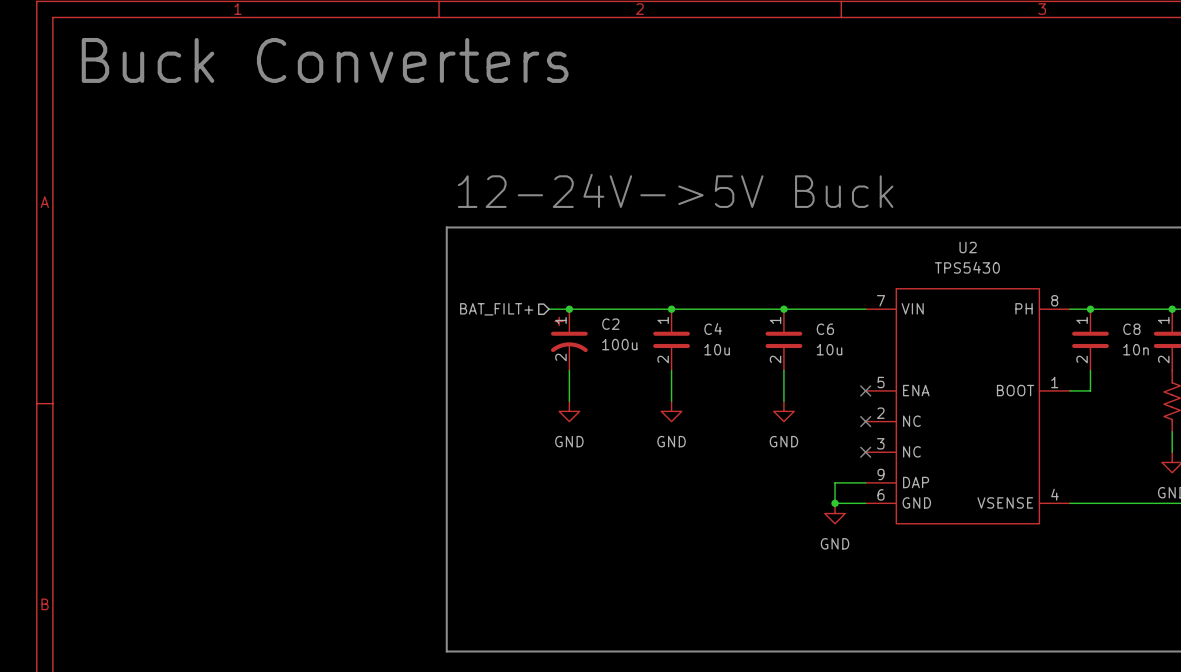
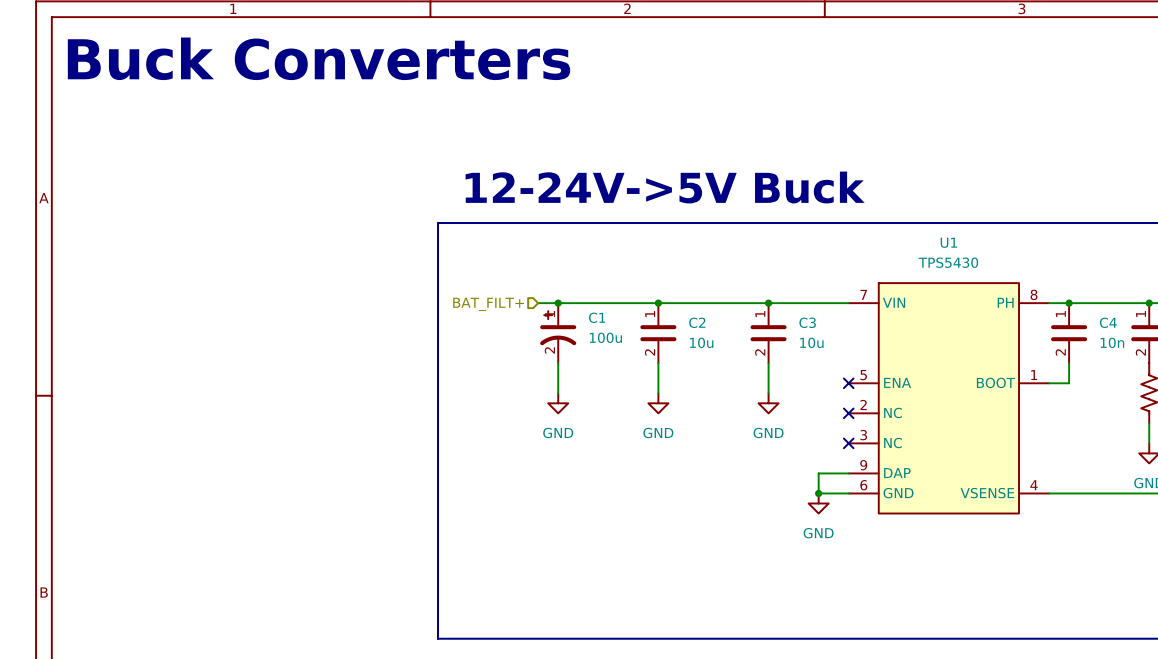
U2 name: U2 (968, 247) -> U1 (948, 242)
C2 name: C2 (610, 324) -> C1 (597, 317)
C4 name: C4 (713, 329) -> C2 (697, 322)
C6 name: C6 (825, 329) -> C3 (807, 322)
C8 name: C8 (1131, 329) -> C4 (1108, 322)

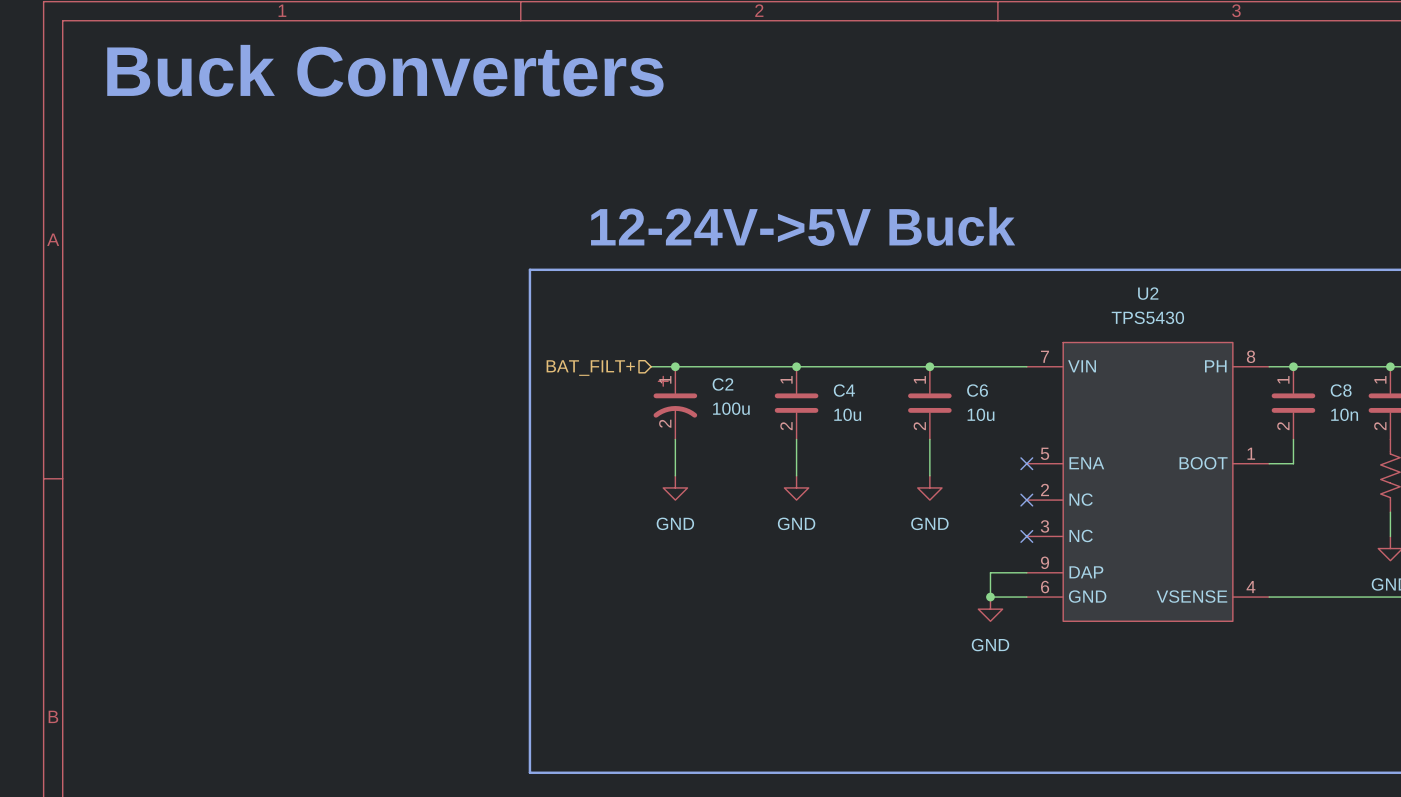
U1 name: U1 (948, 242) -> U2 (1148, 293)
C1 name: C1 (597, 317) -> C2 (722, 384)
C2 name: C2 (697, 322) -> C4 (844, 390)
C3 name: C3 (807, 322) -> C6 (977, 390)
C4 name: C4 (1108, 322) -> C8 (1341, 390)

